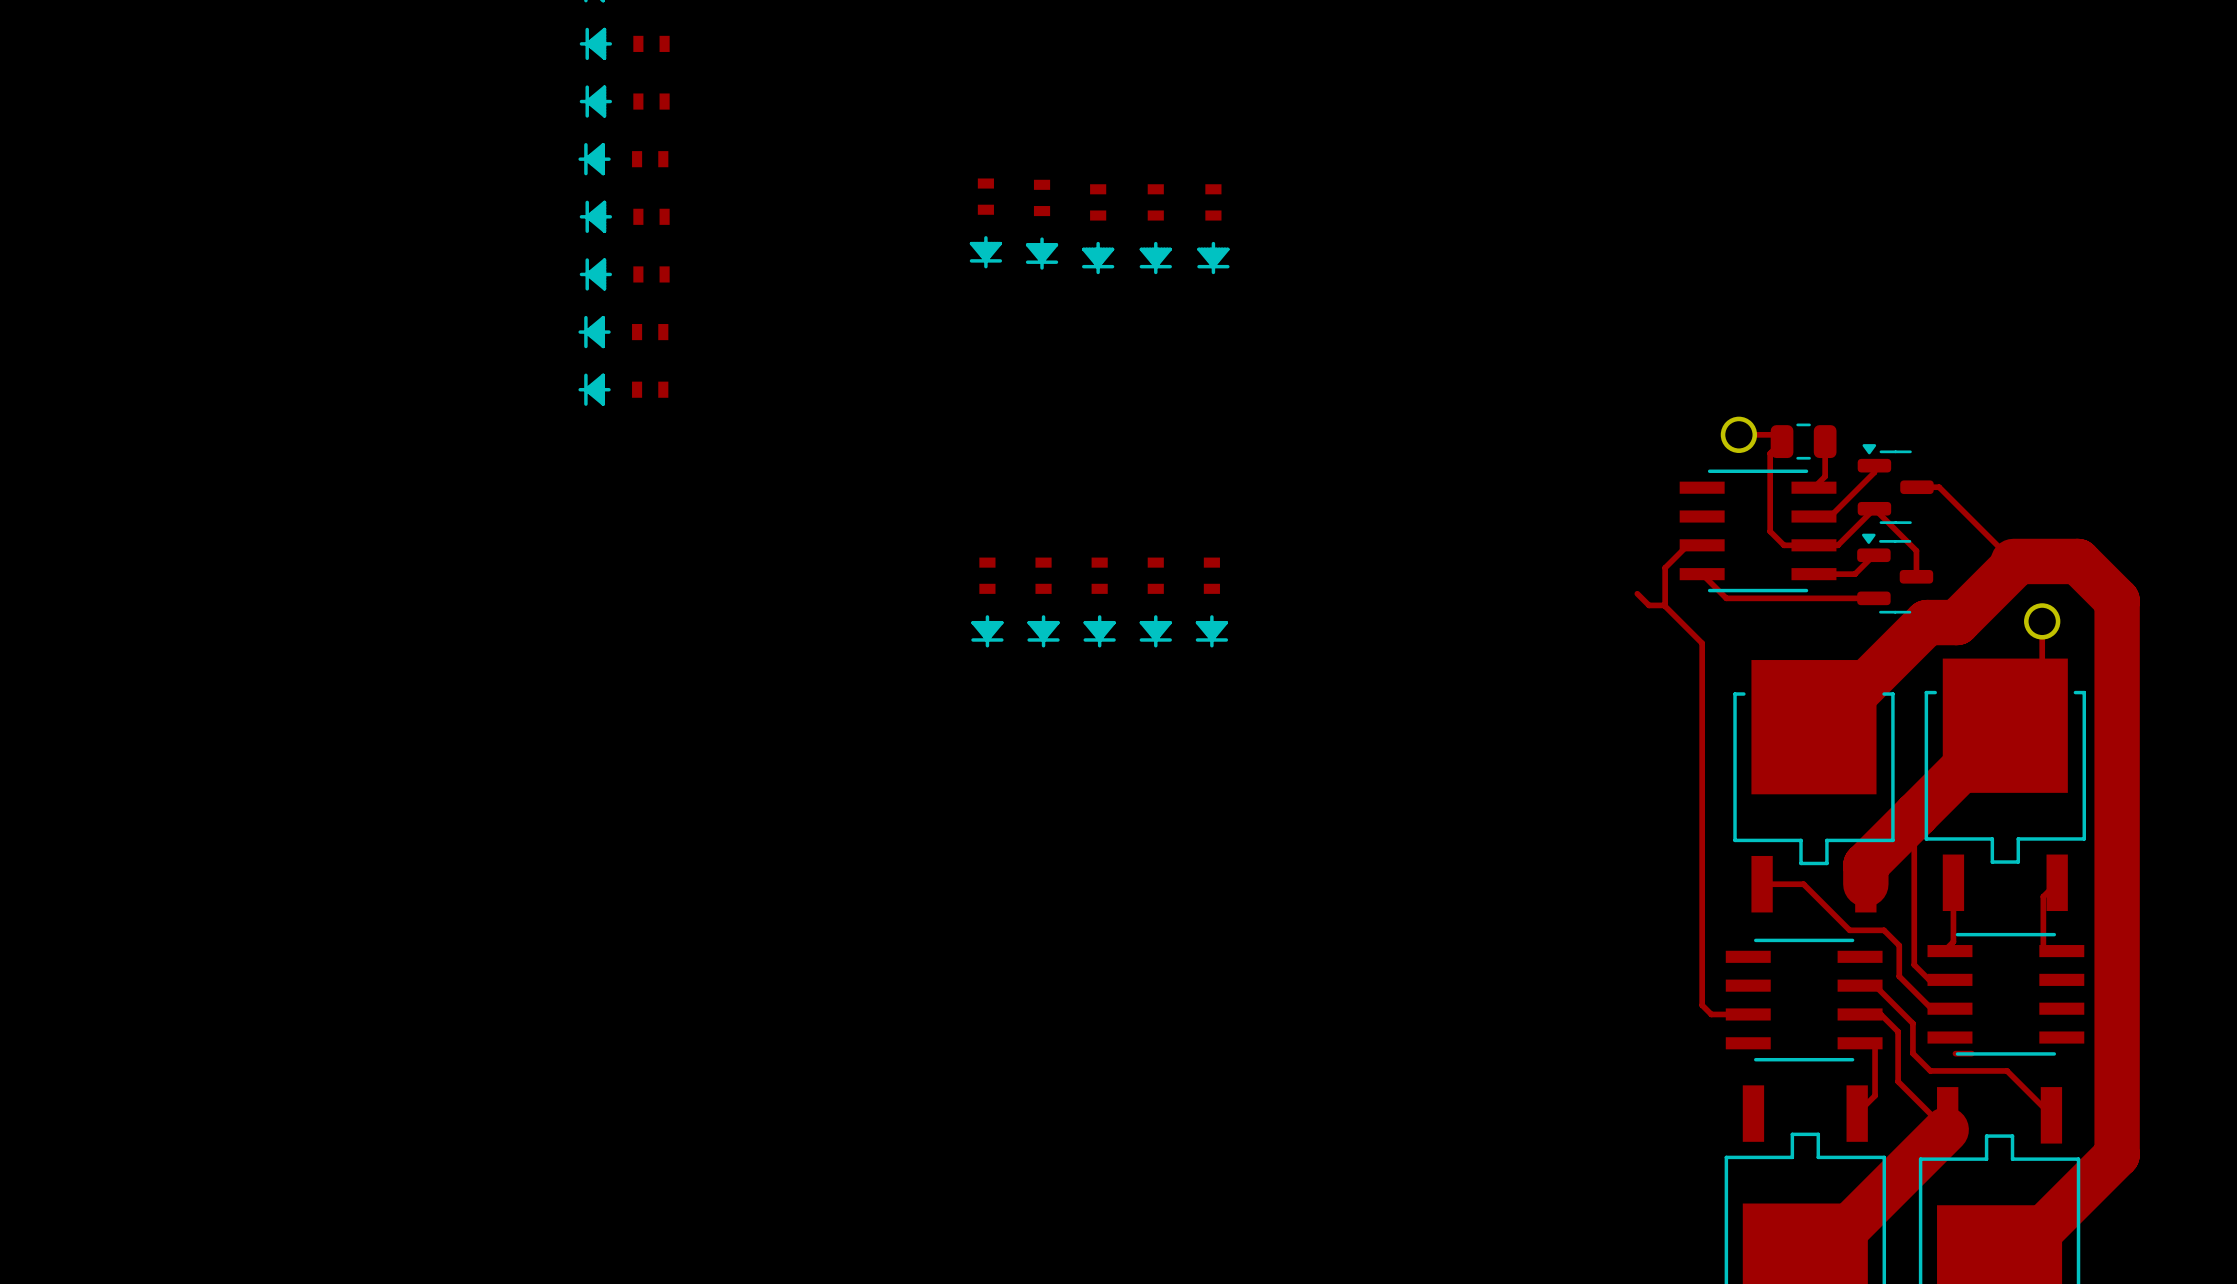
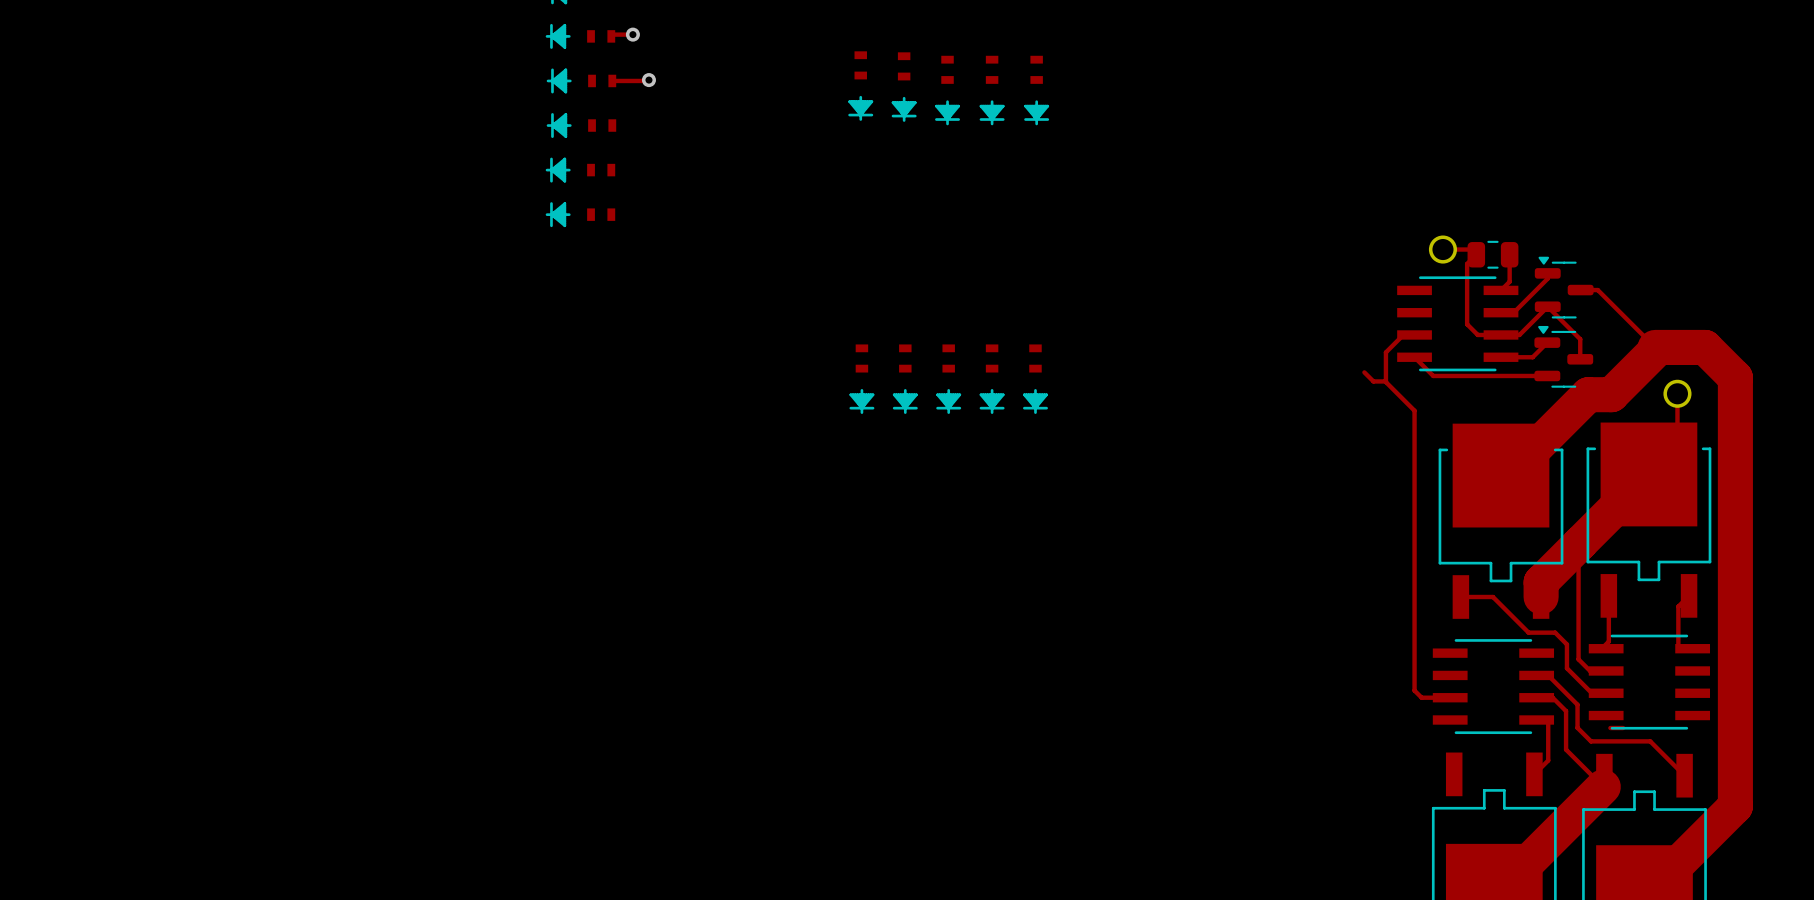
track: none -> (632, 34) (613, 34) (611, 36)
via: none -> (632, 34)
track: none -> (648, 80) (612, 80)
via: none -> (648, 80)

